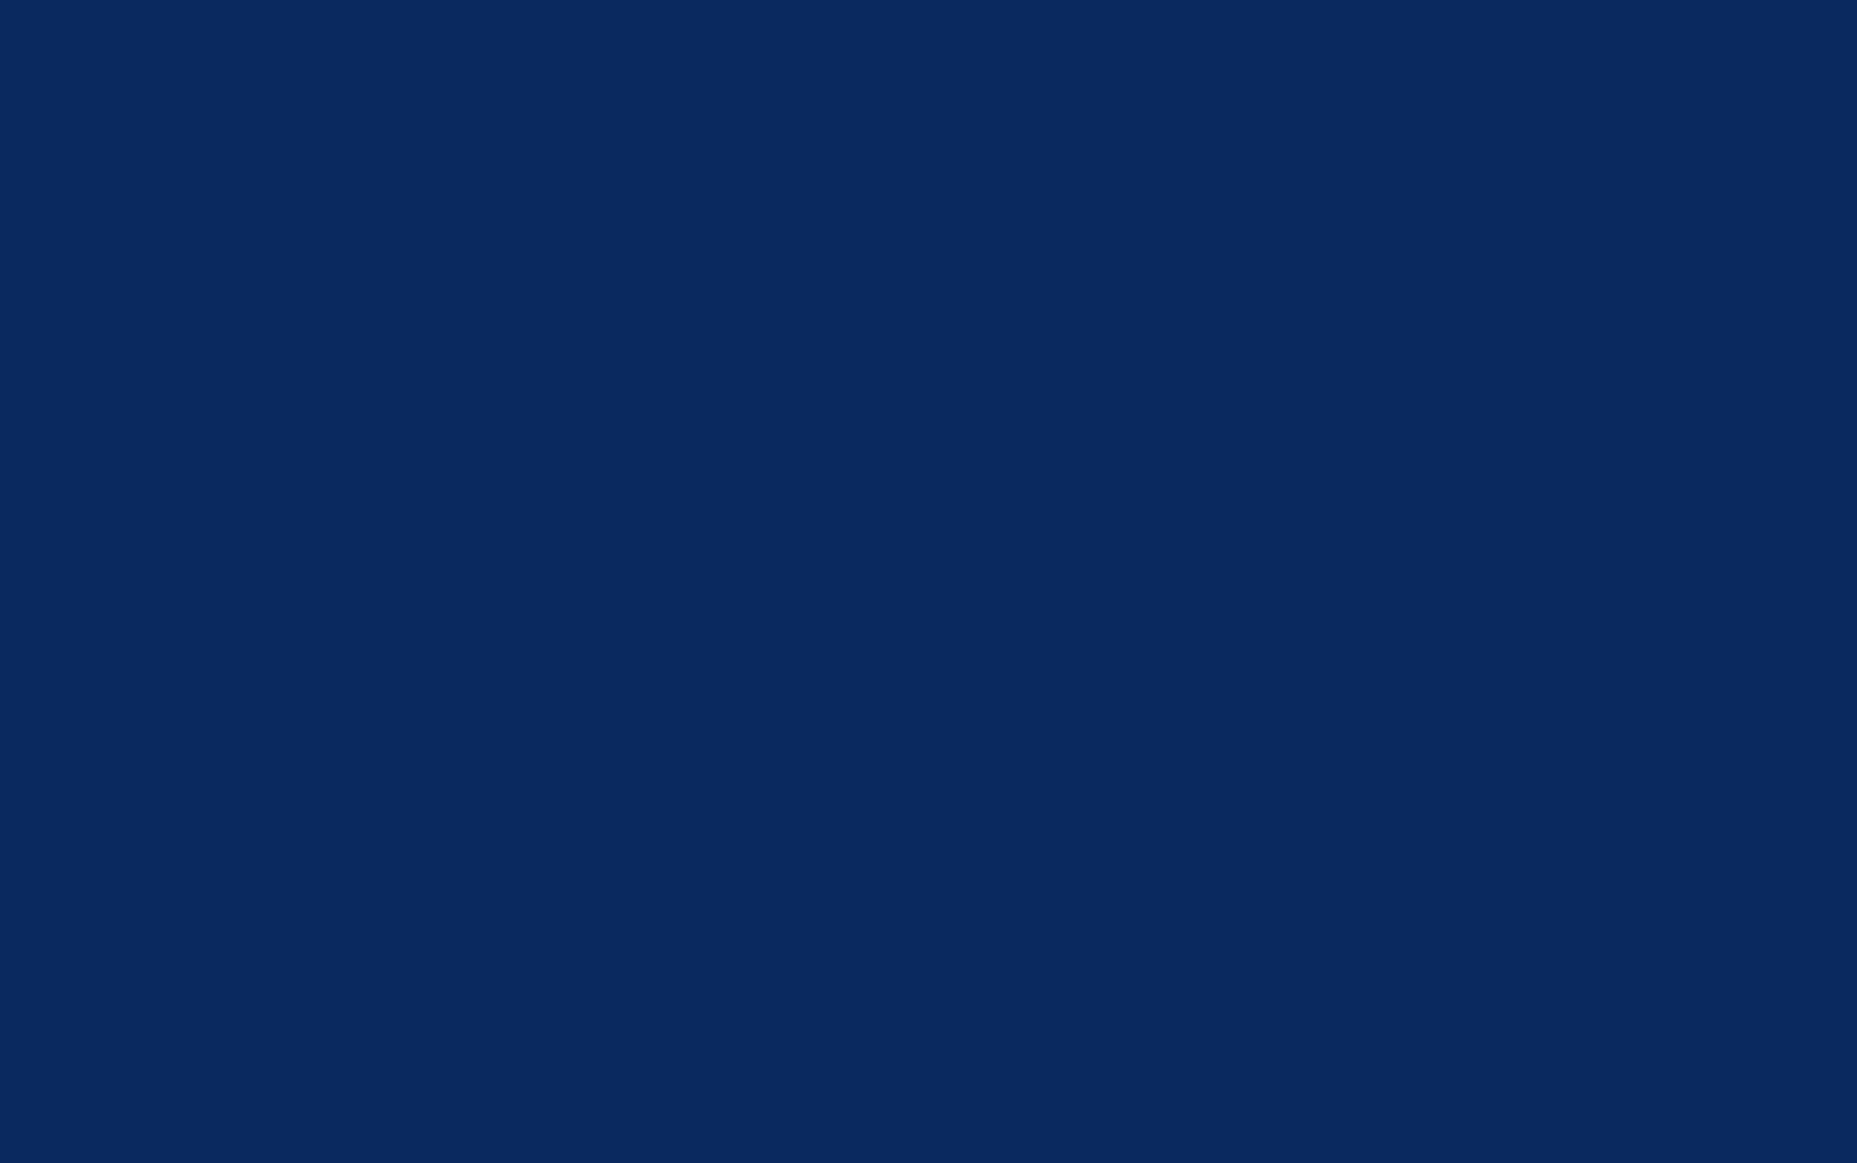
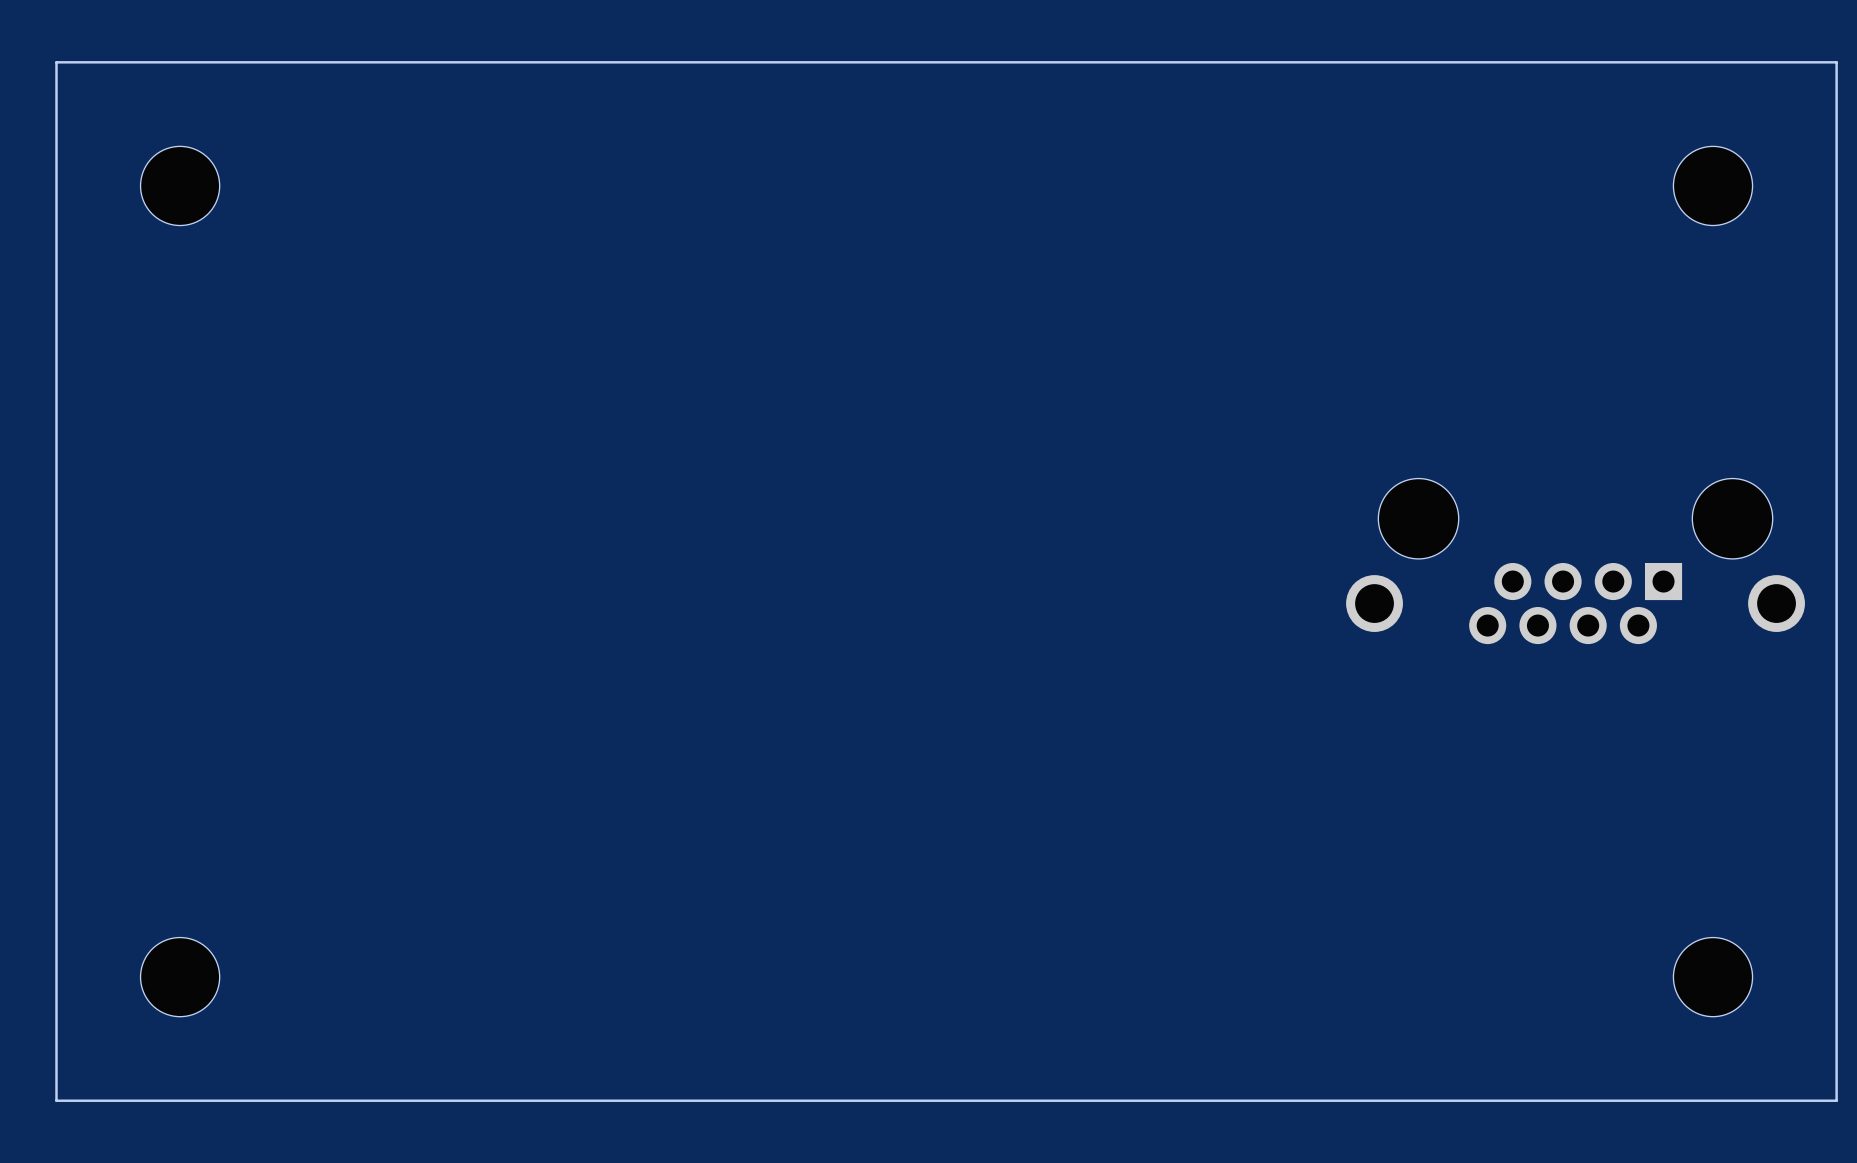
board edge: none -> (1836, 62) (56, 62) (56, 1100) (1836, 1100) (1836, 62)
part: none -> (180, 185)
part: none -> (1712, 185)
part: none -> (1575, 561)
part: none -> (180, 977)
part: none -> (1712, 977)

